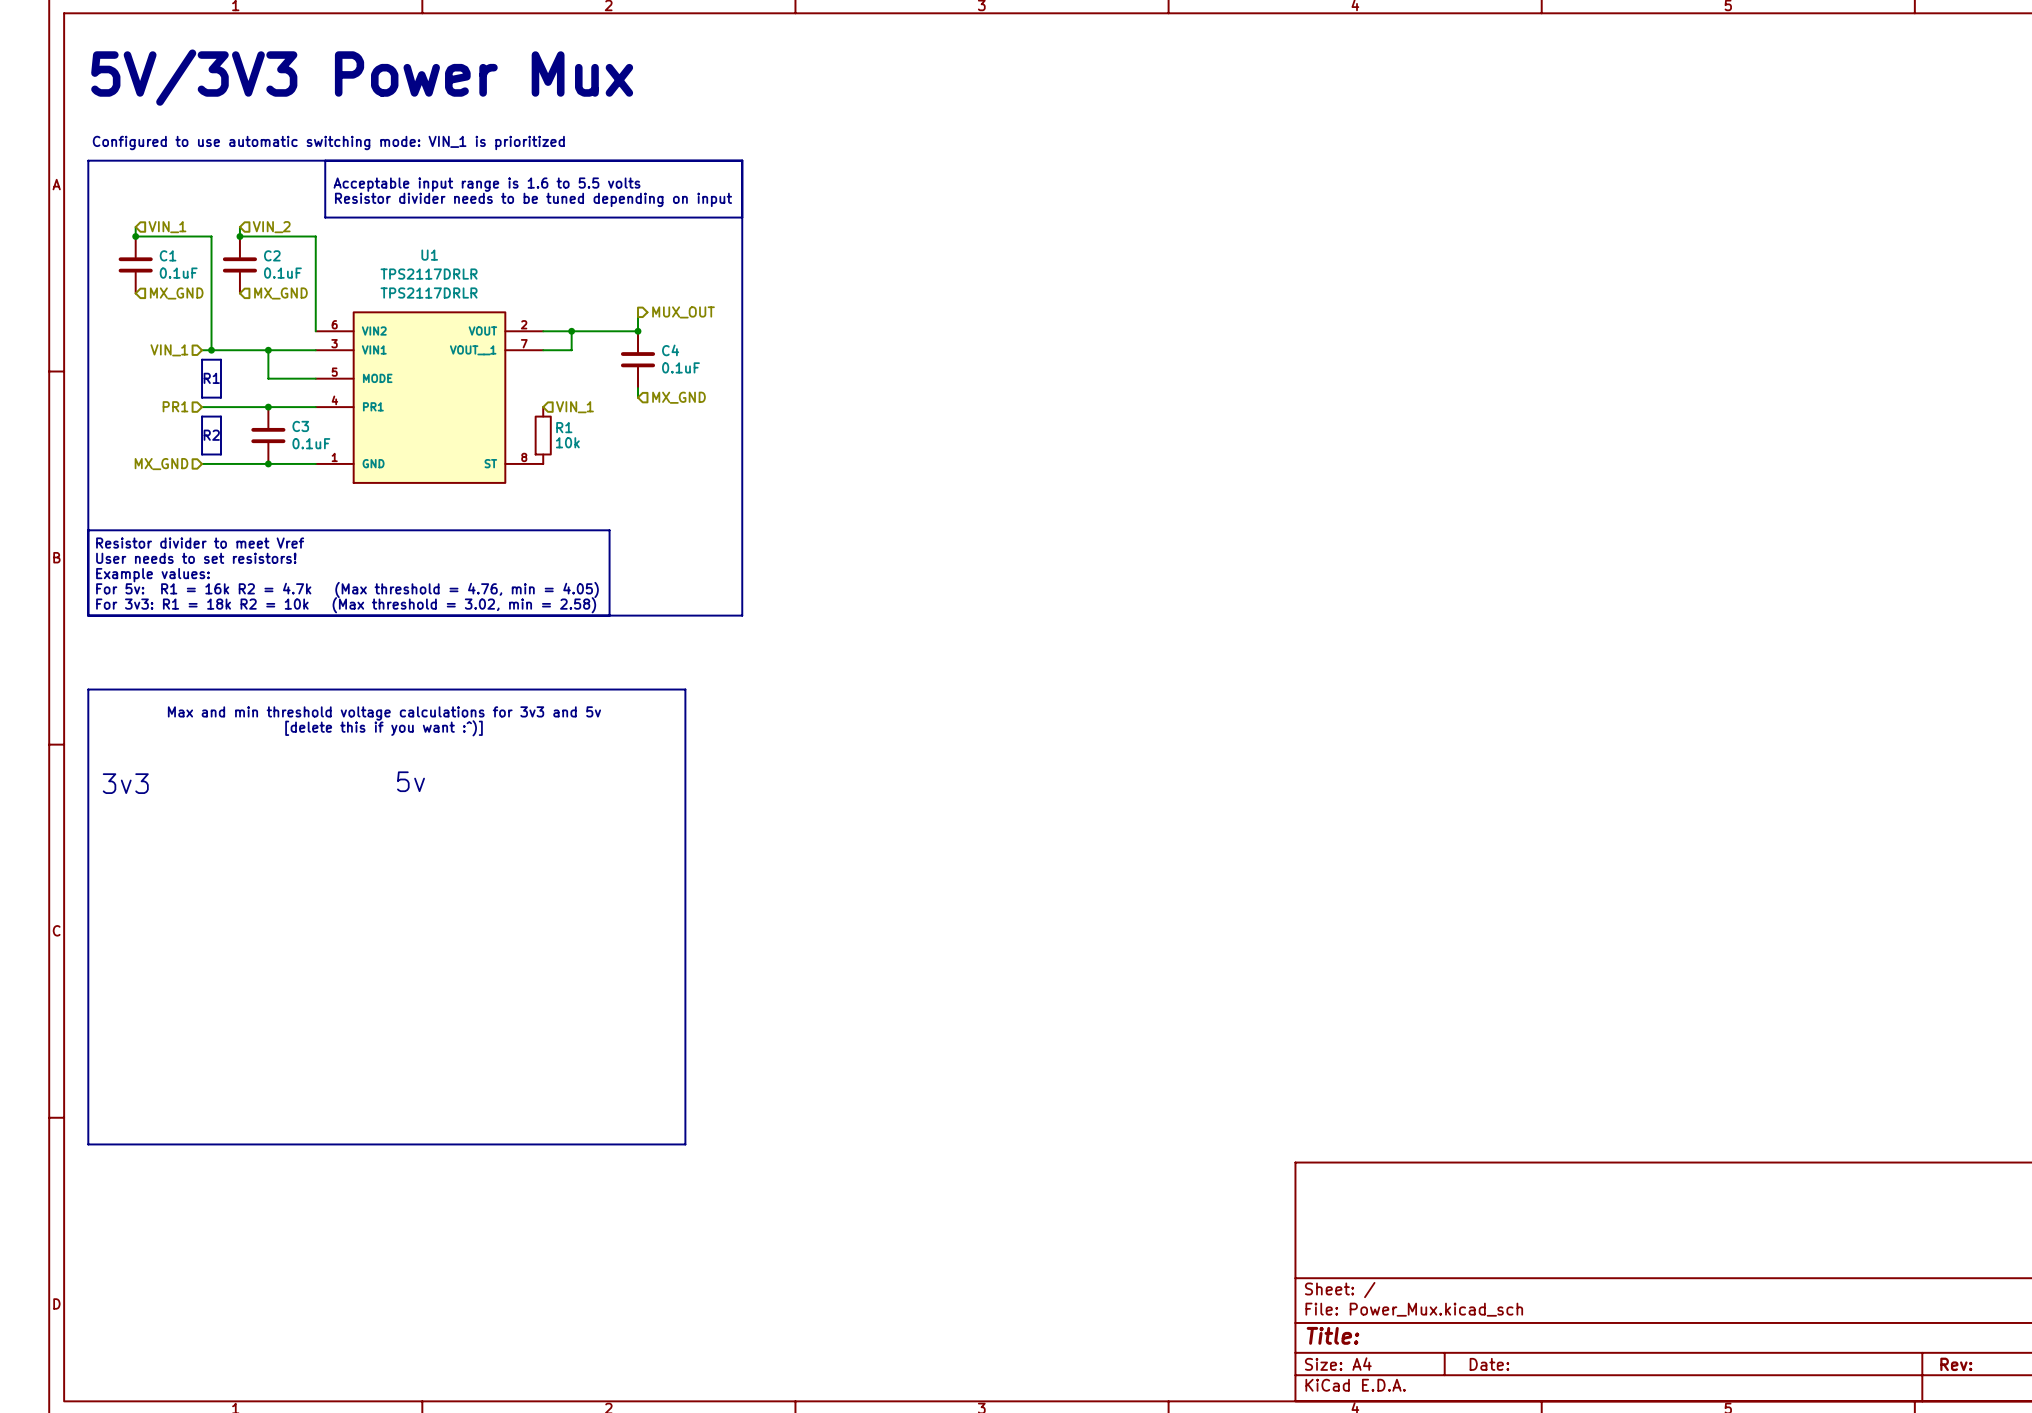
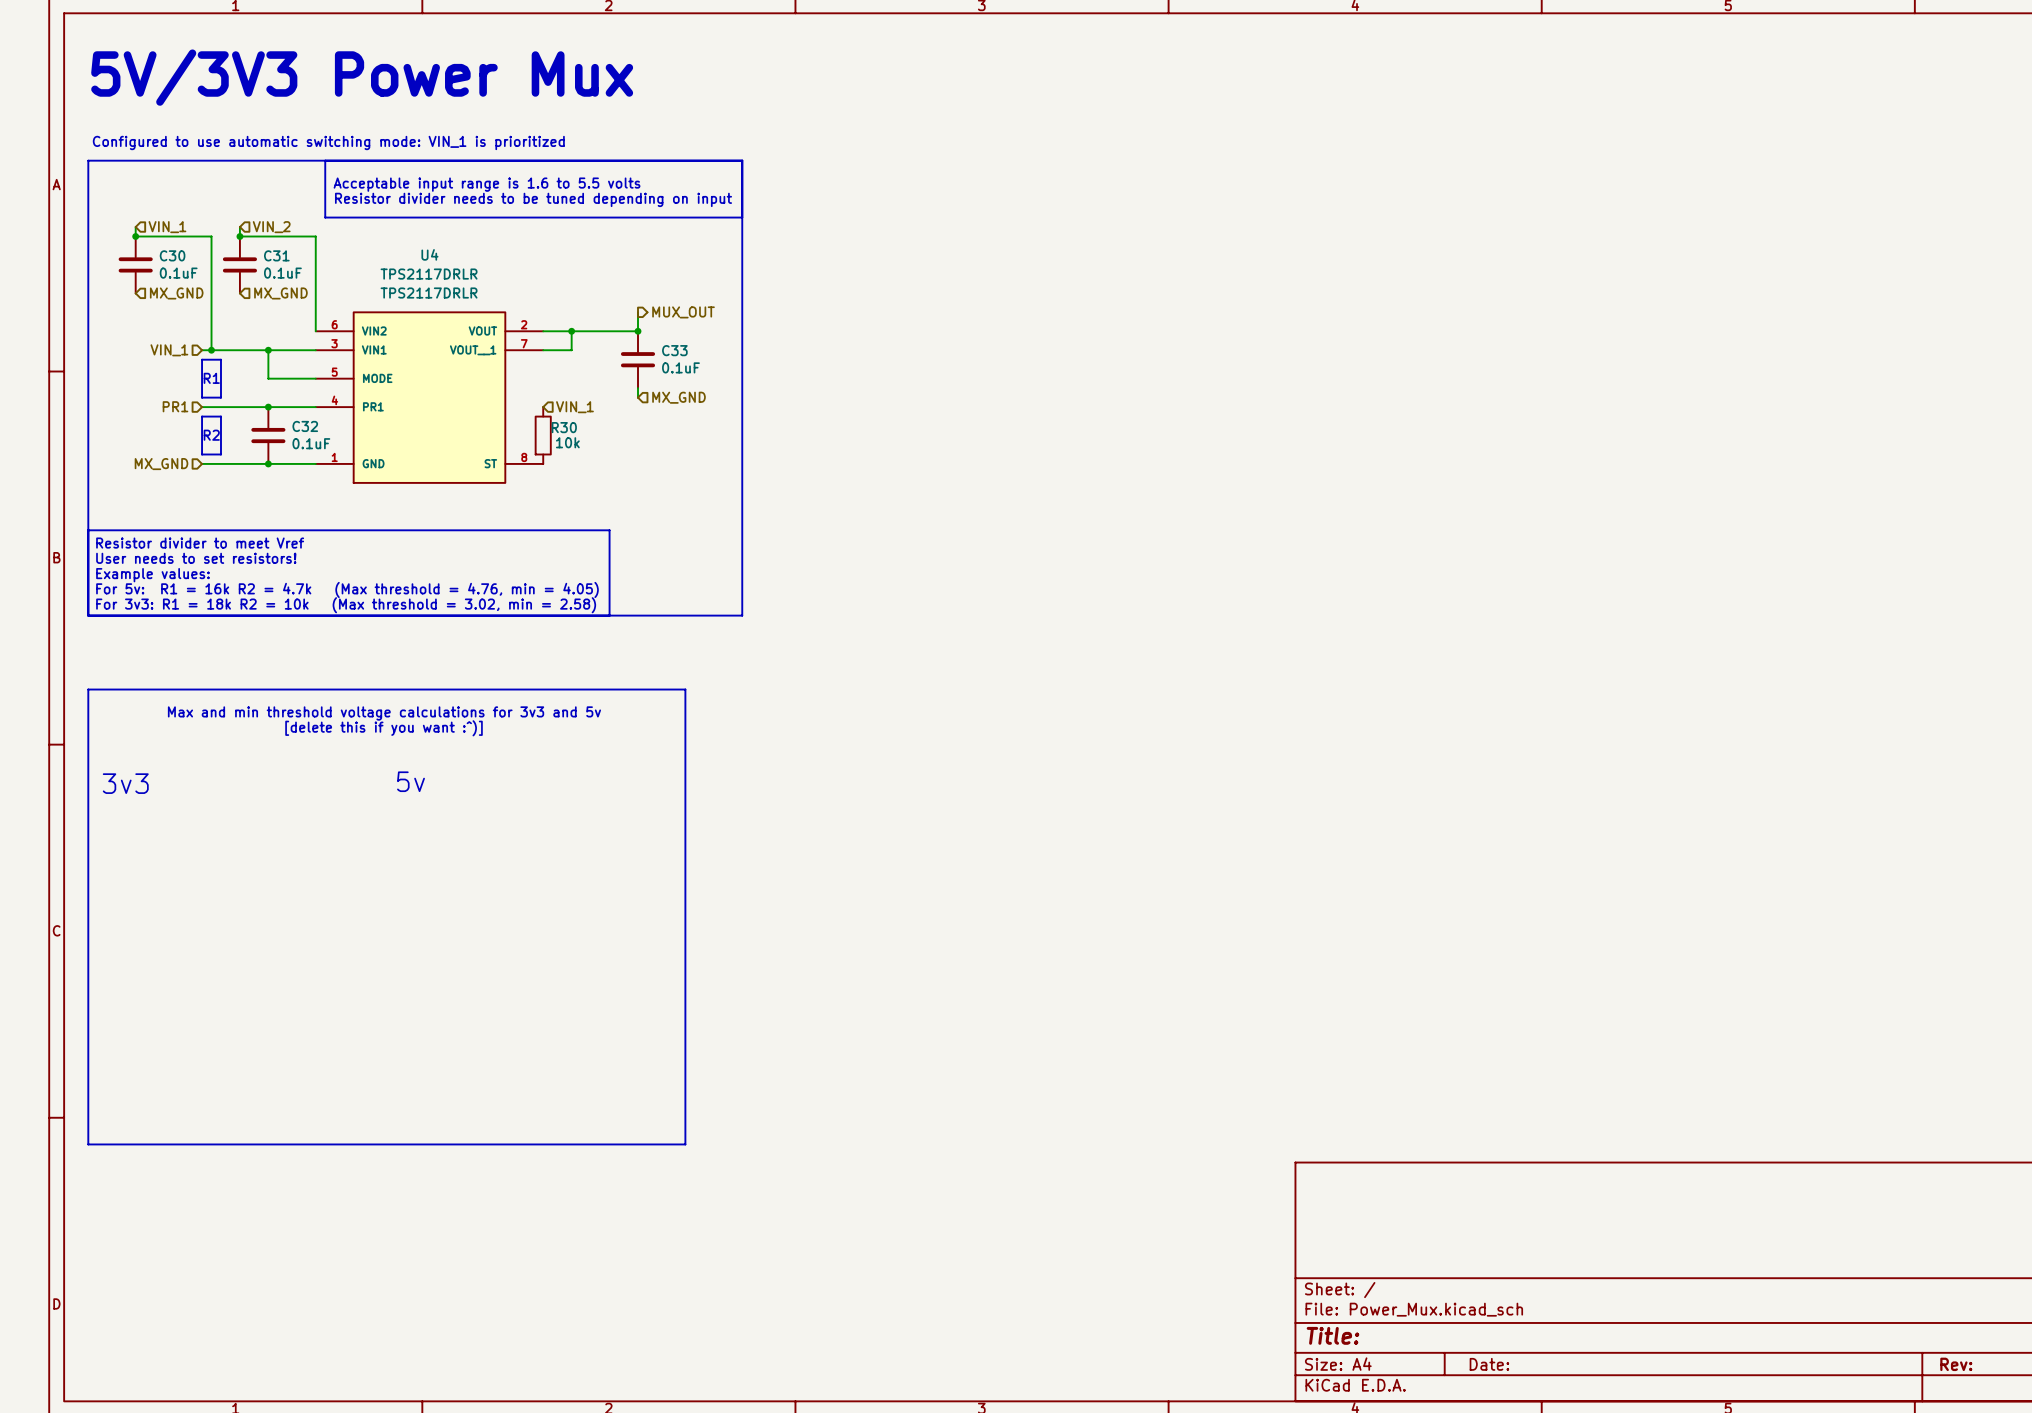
C1 name: C1 (168, 255) -> C30 (172, 255)
C2 name: C2 (272, 255) -> C31 (276, 255)
U1 name: U1 (429, 255) -> U4 (429, 254)
C4 name: C4 (670, 350) -> C33 (674, 350)
C3 name: C3 (300, 426) -> C32 (305, 426)
R1 name: R1 (564, 427) -> R30 (564, 427)

